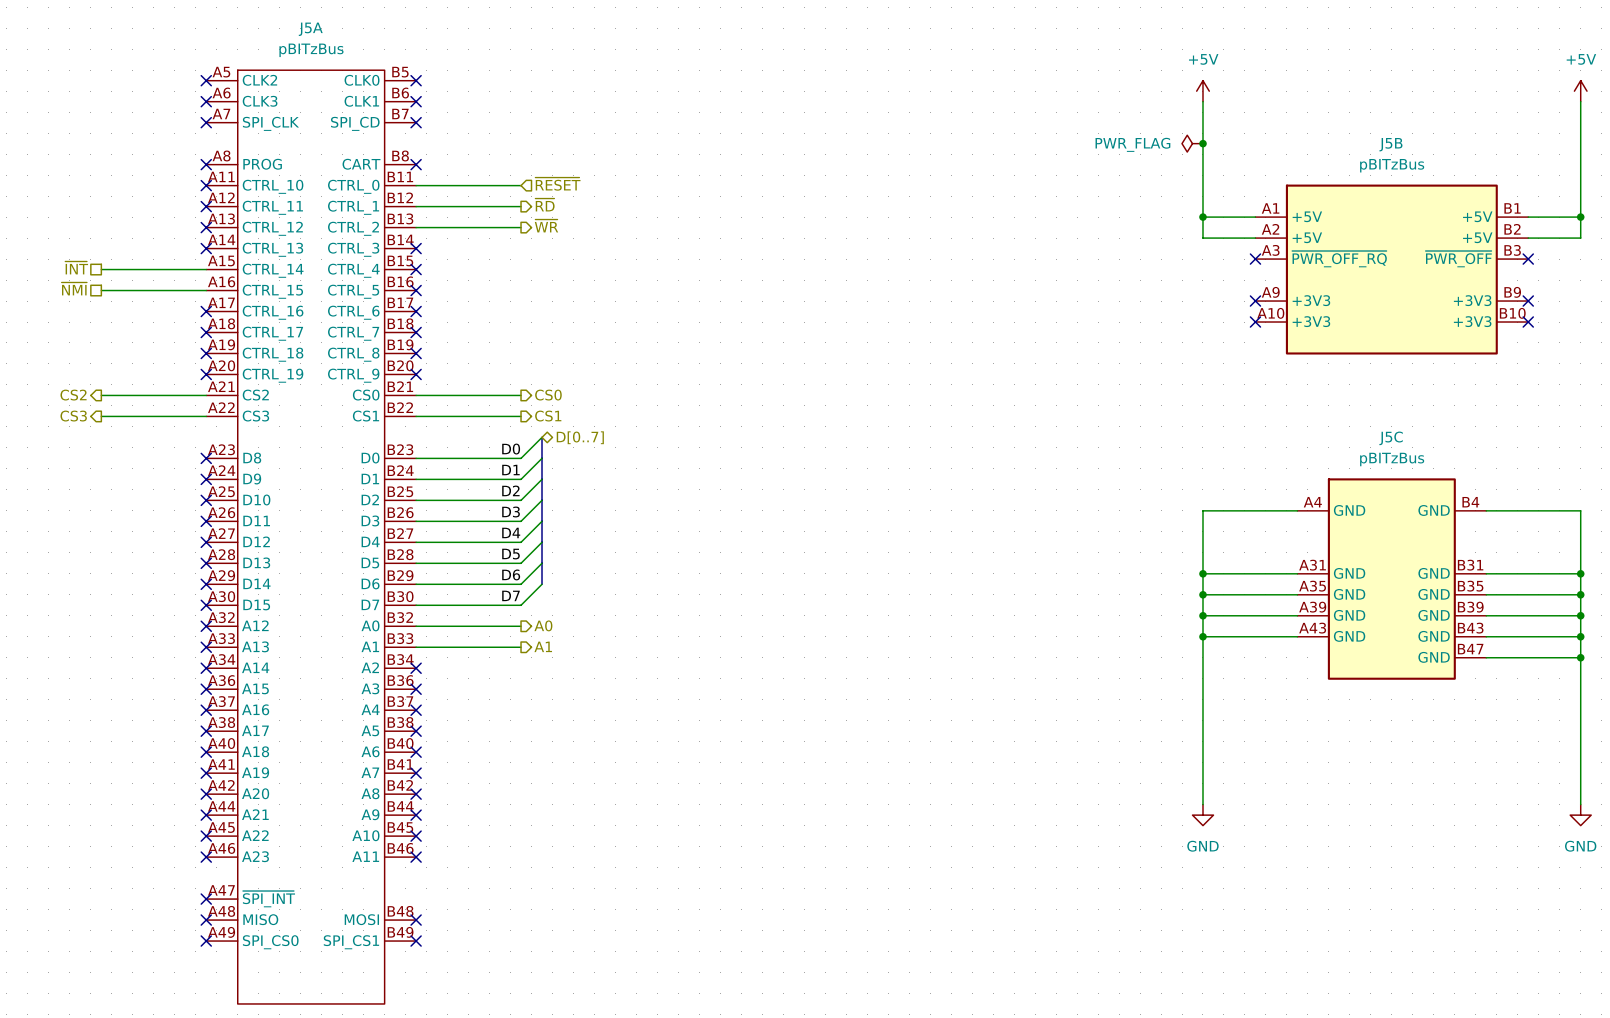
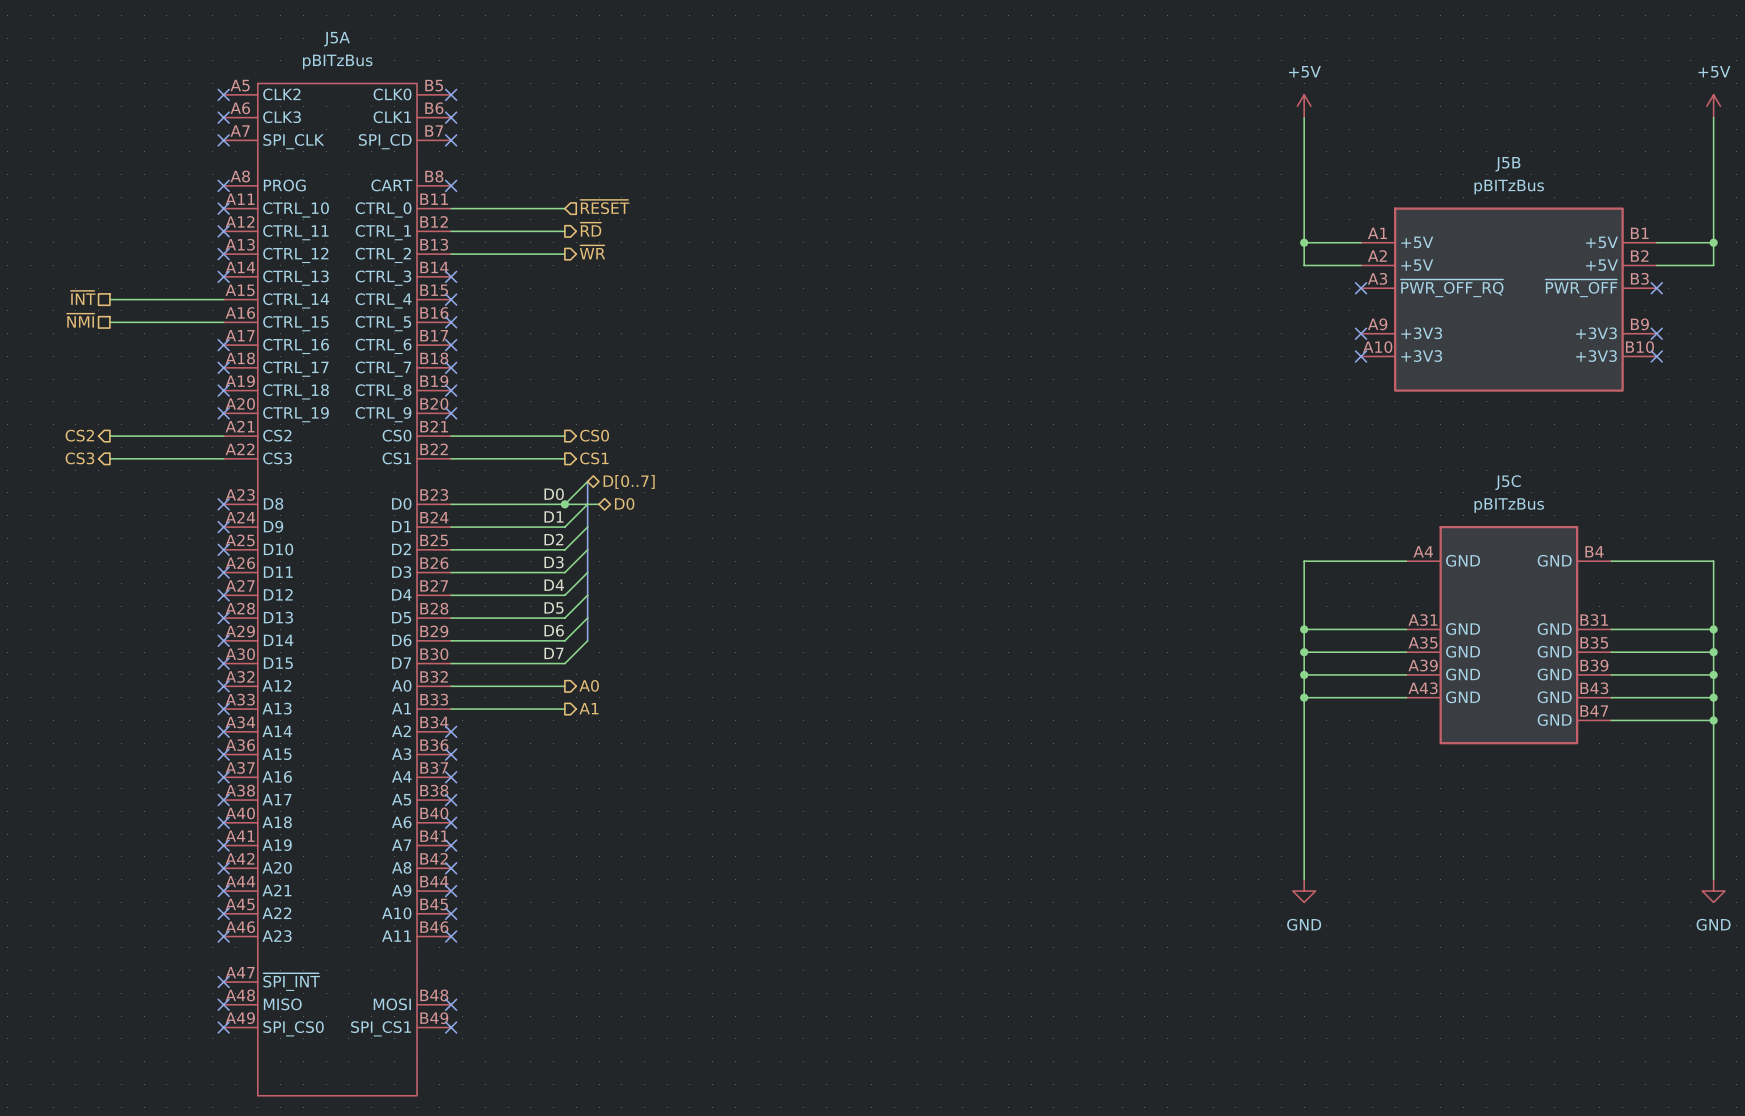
power symbol: PWR_FLAG (1192, 143) -> none
junction: (1202, 143) -> none
wire: none -> (564, 504) (599, 504)
junction: none -> (564, 504)
hierarchical label: none -> D0 (624, 503)

